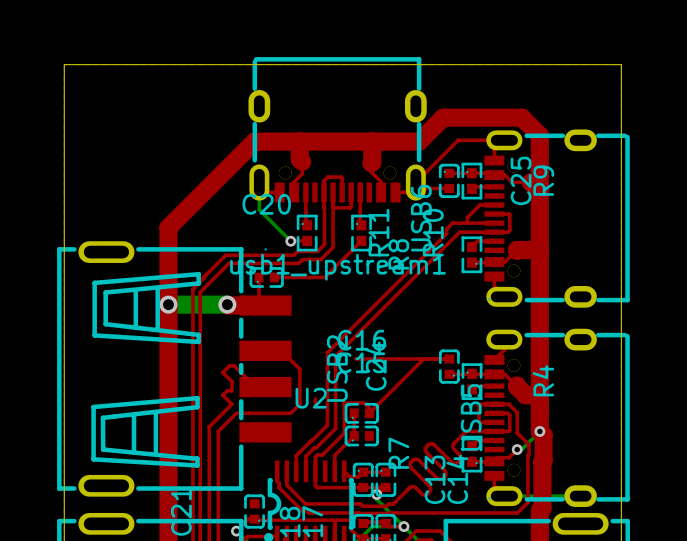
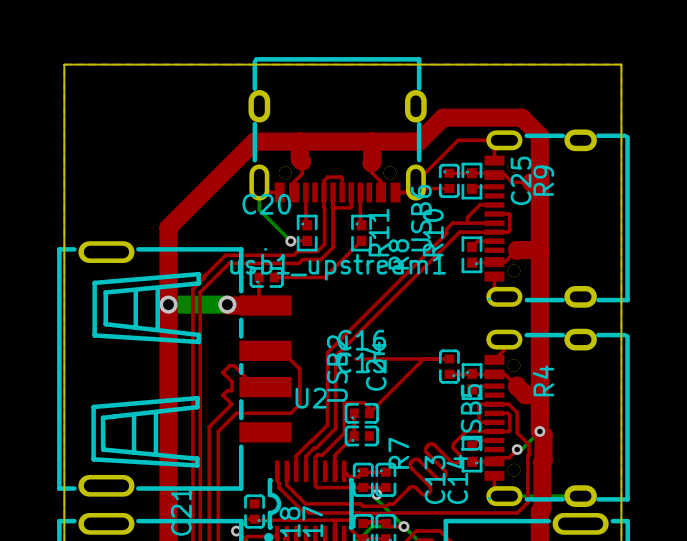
top track: (315, 399) (315, 404) -> none

